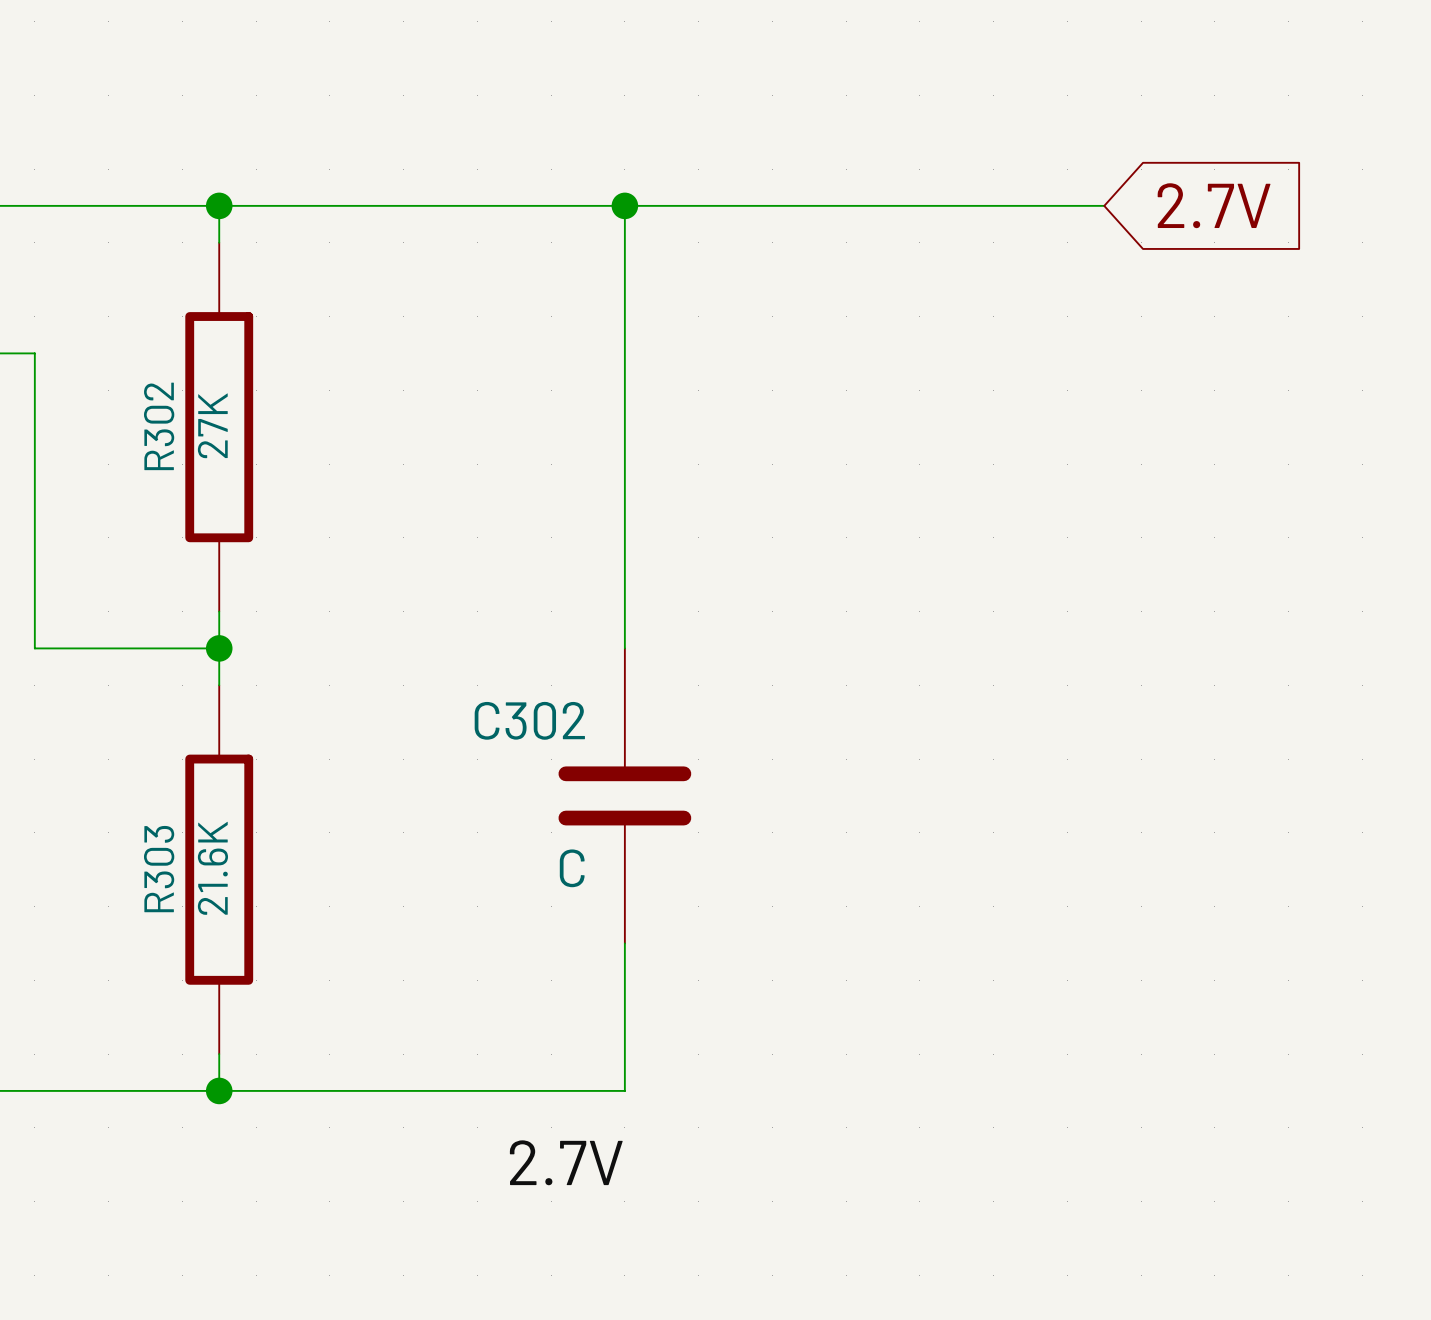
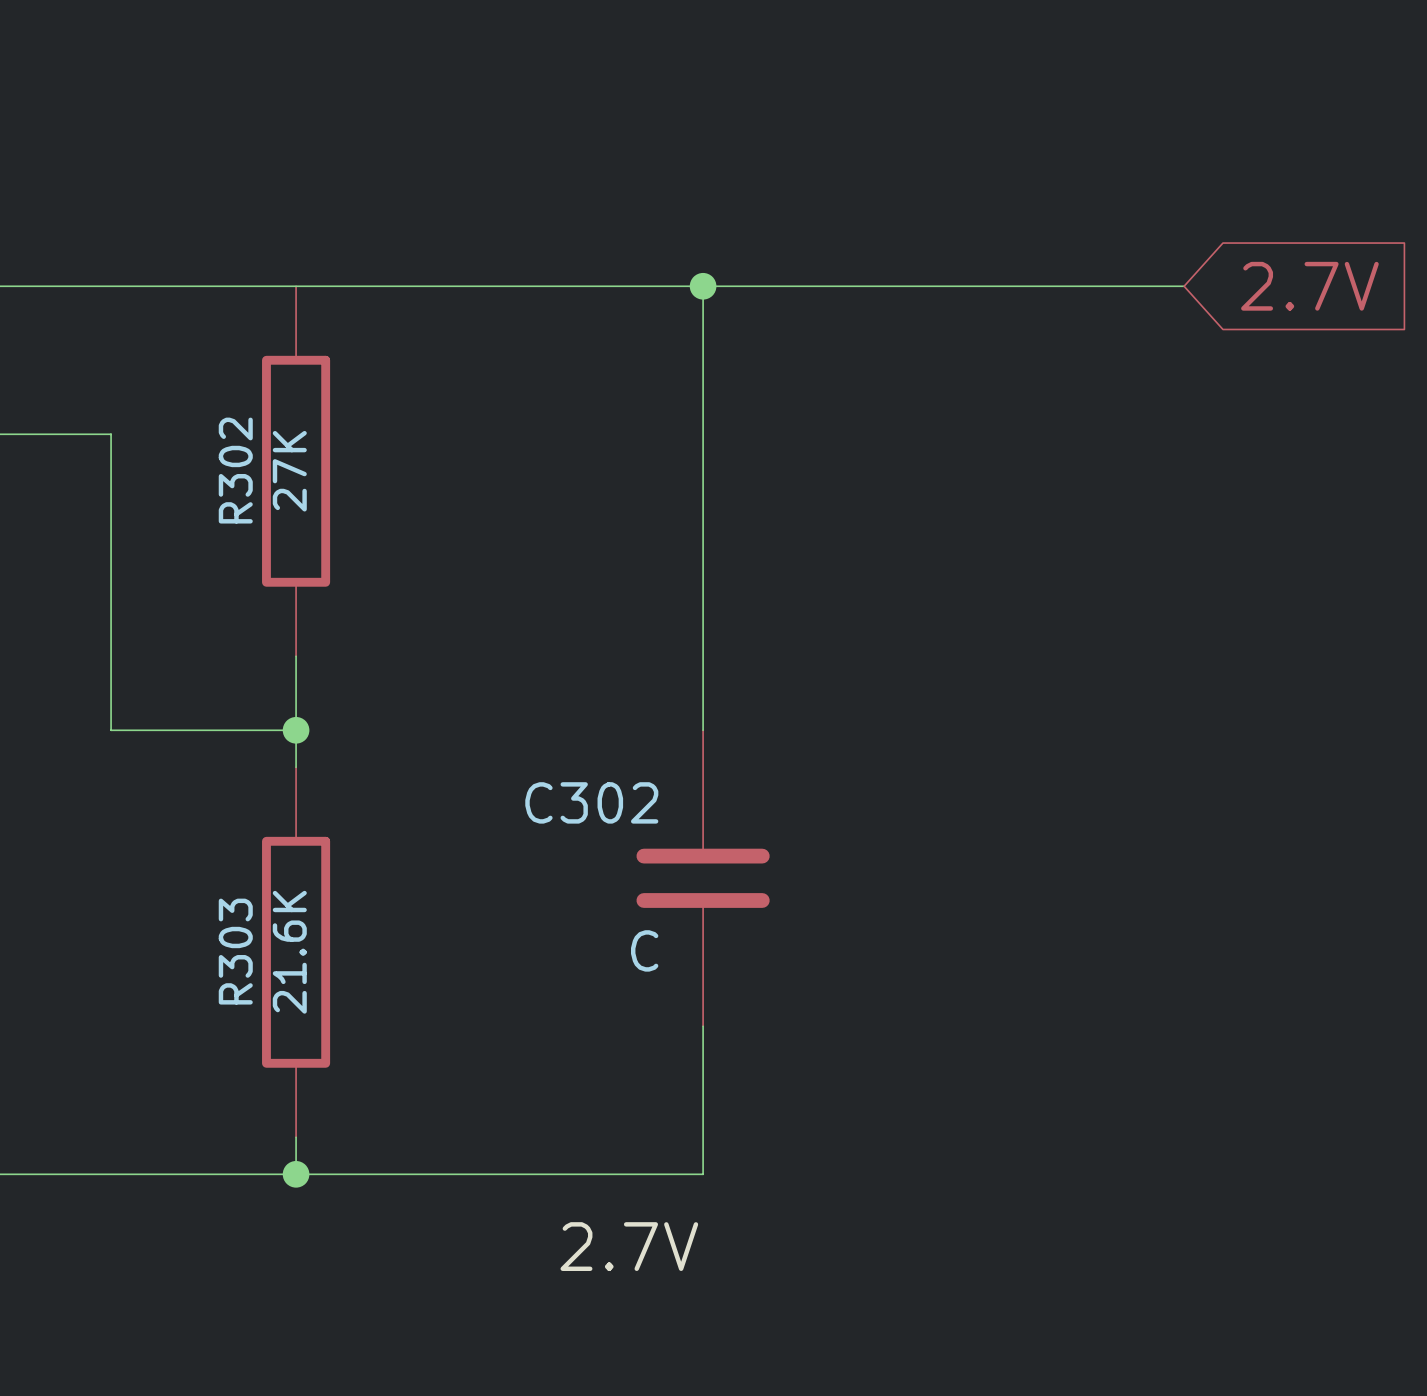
junction: (219, 205) -> none
R302 position: (219, 427) -> (296, 471)

